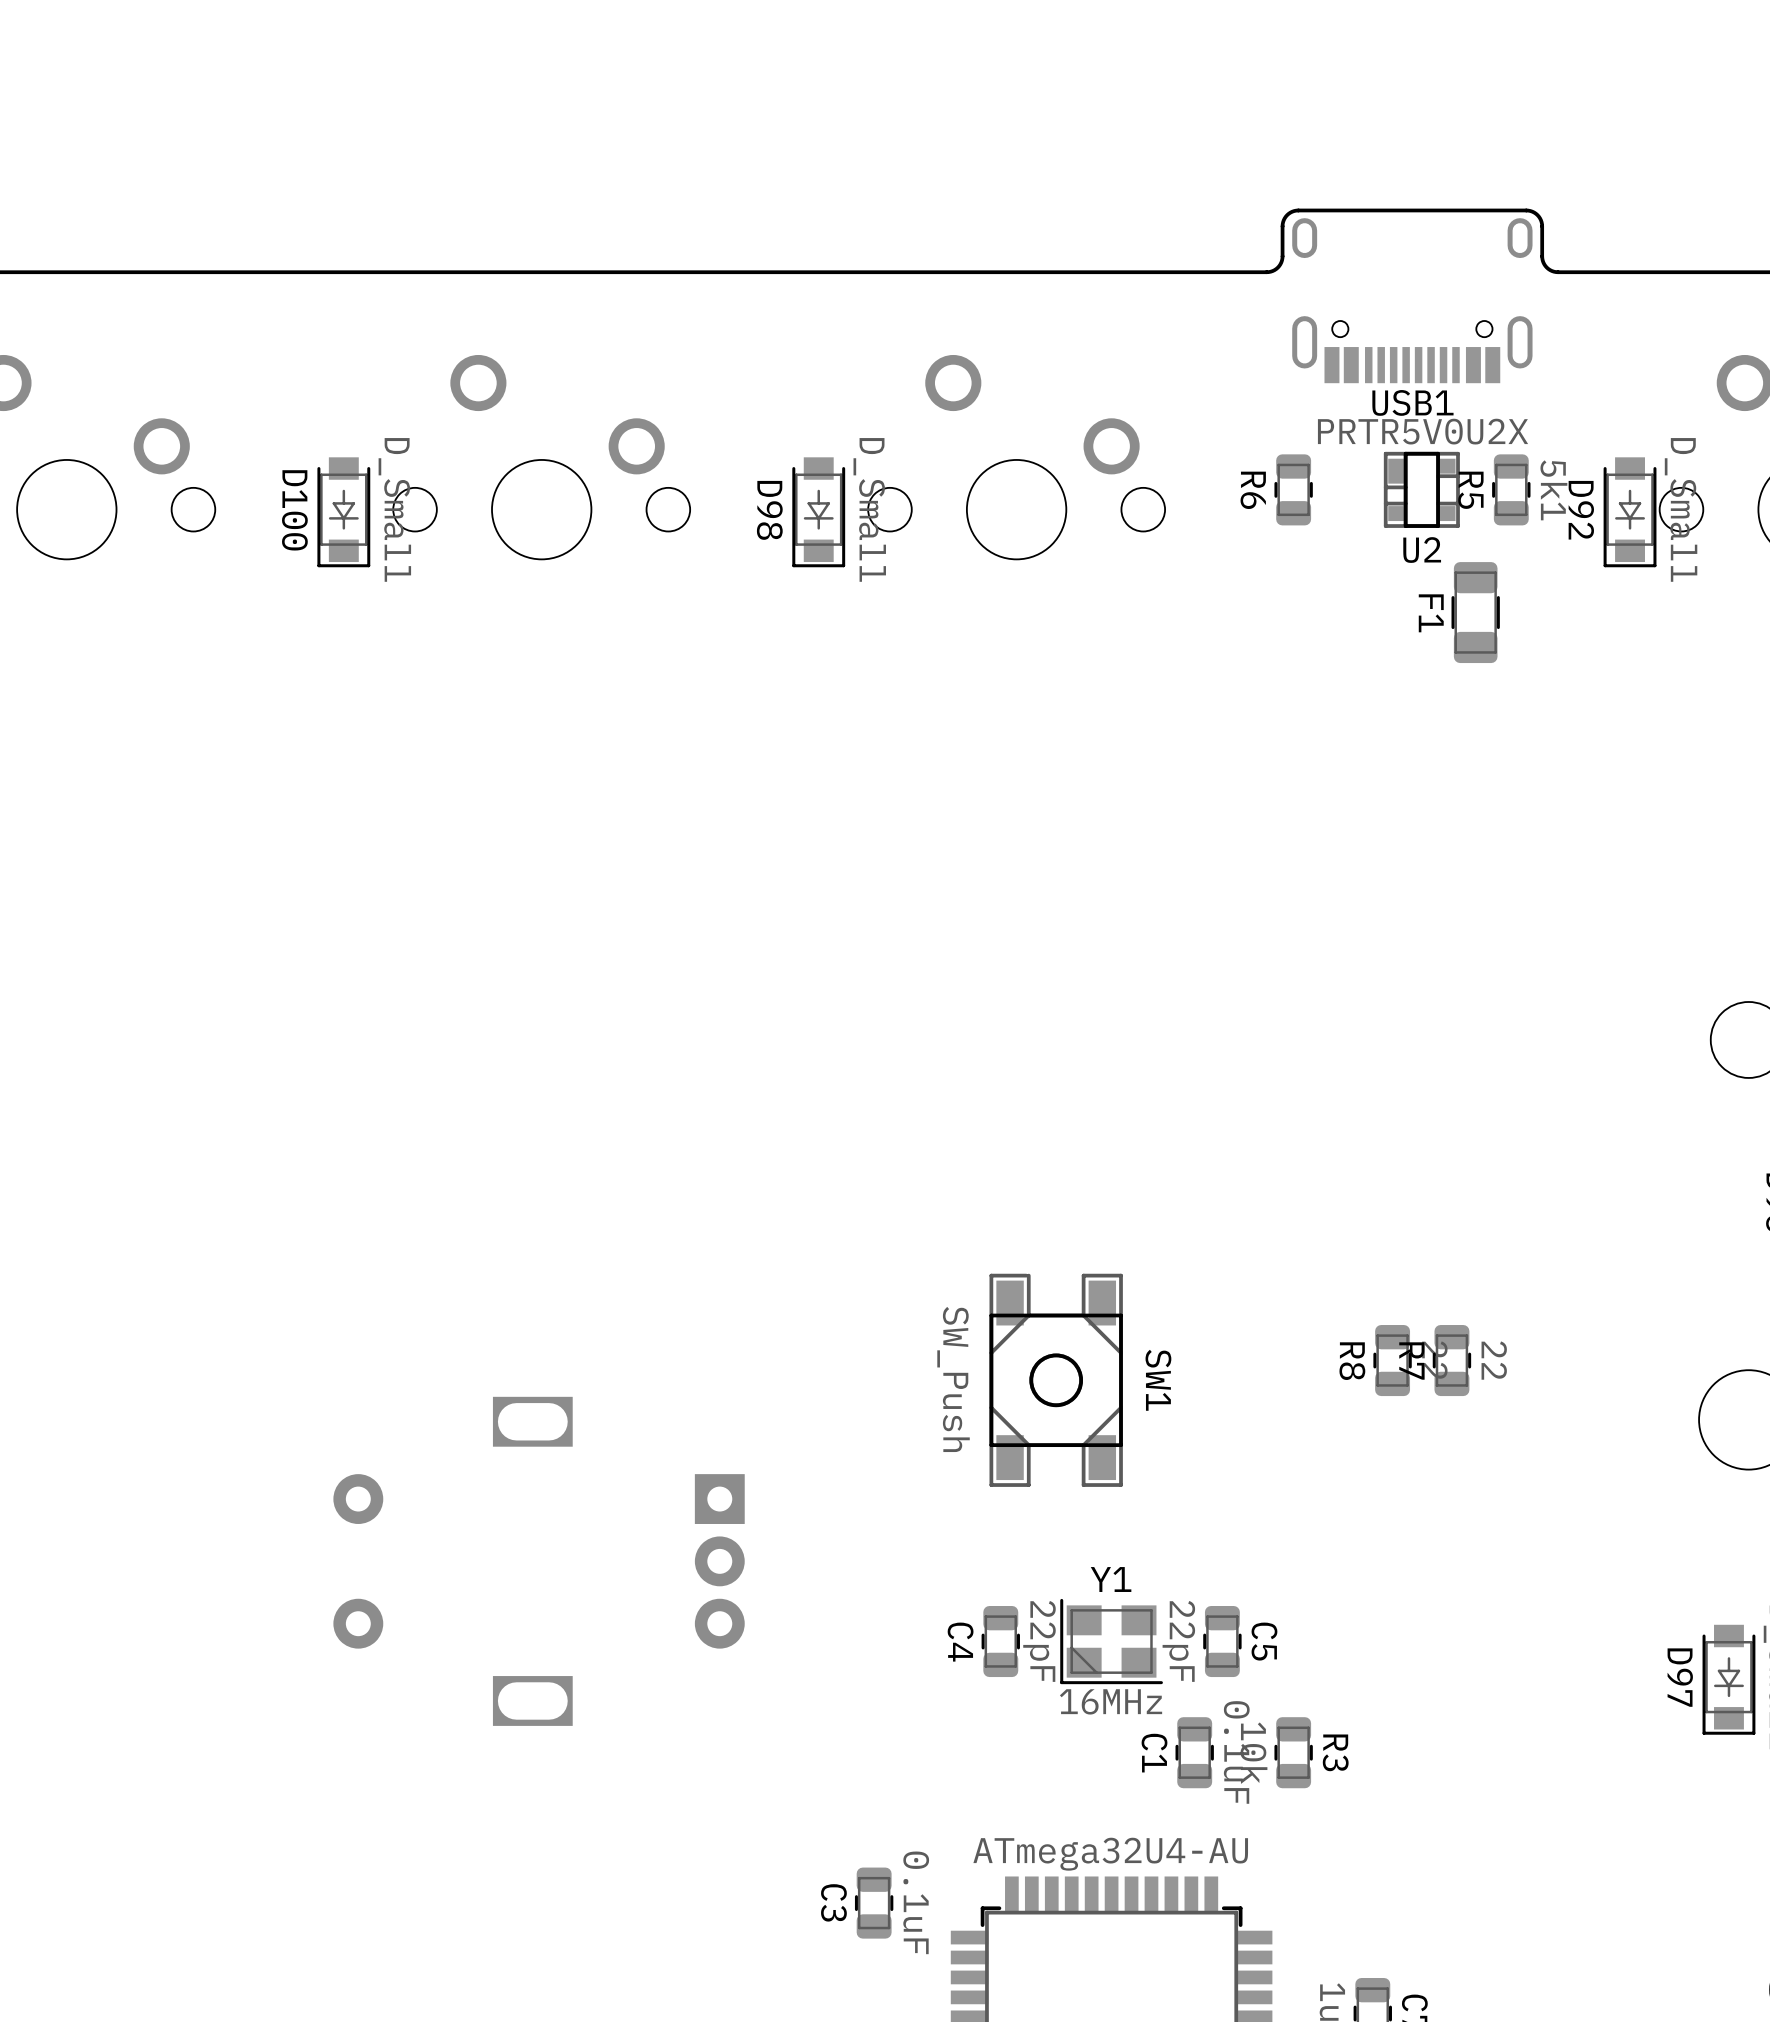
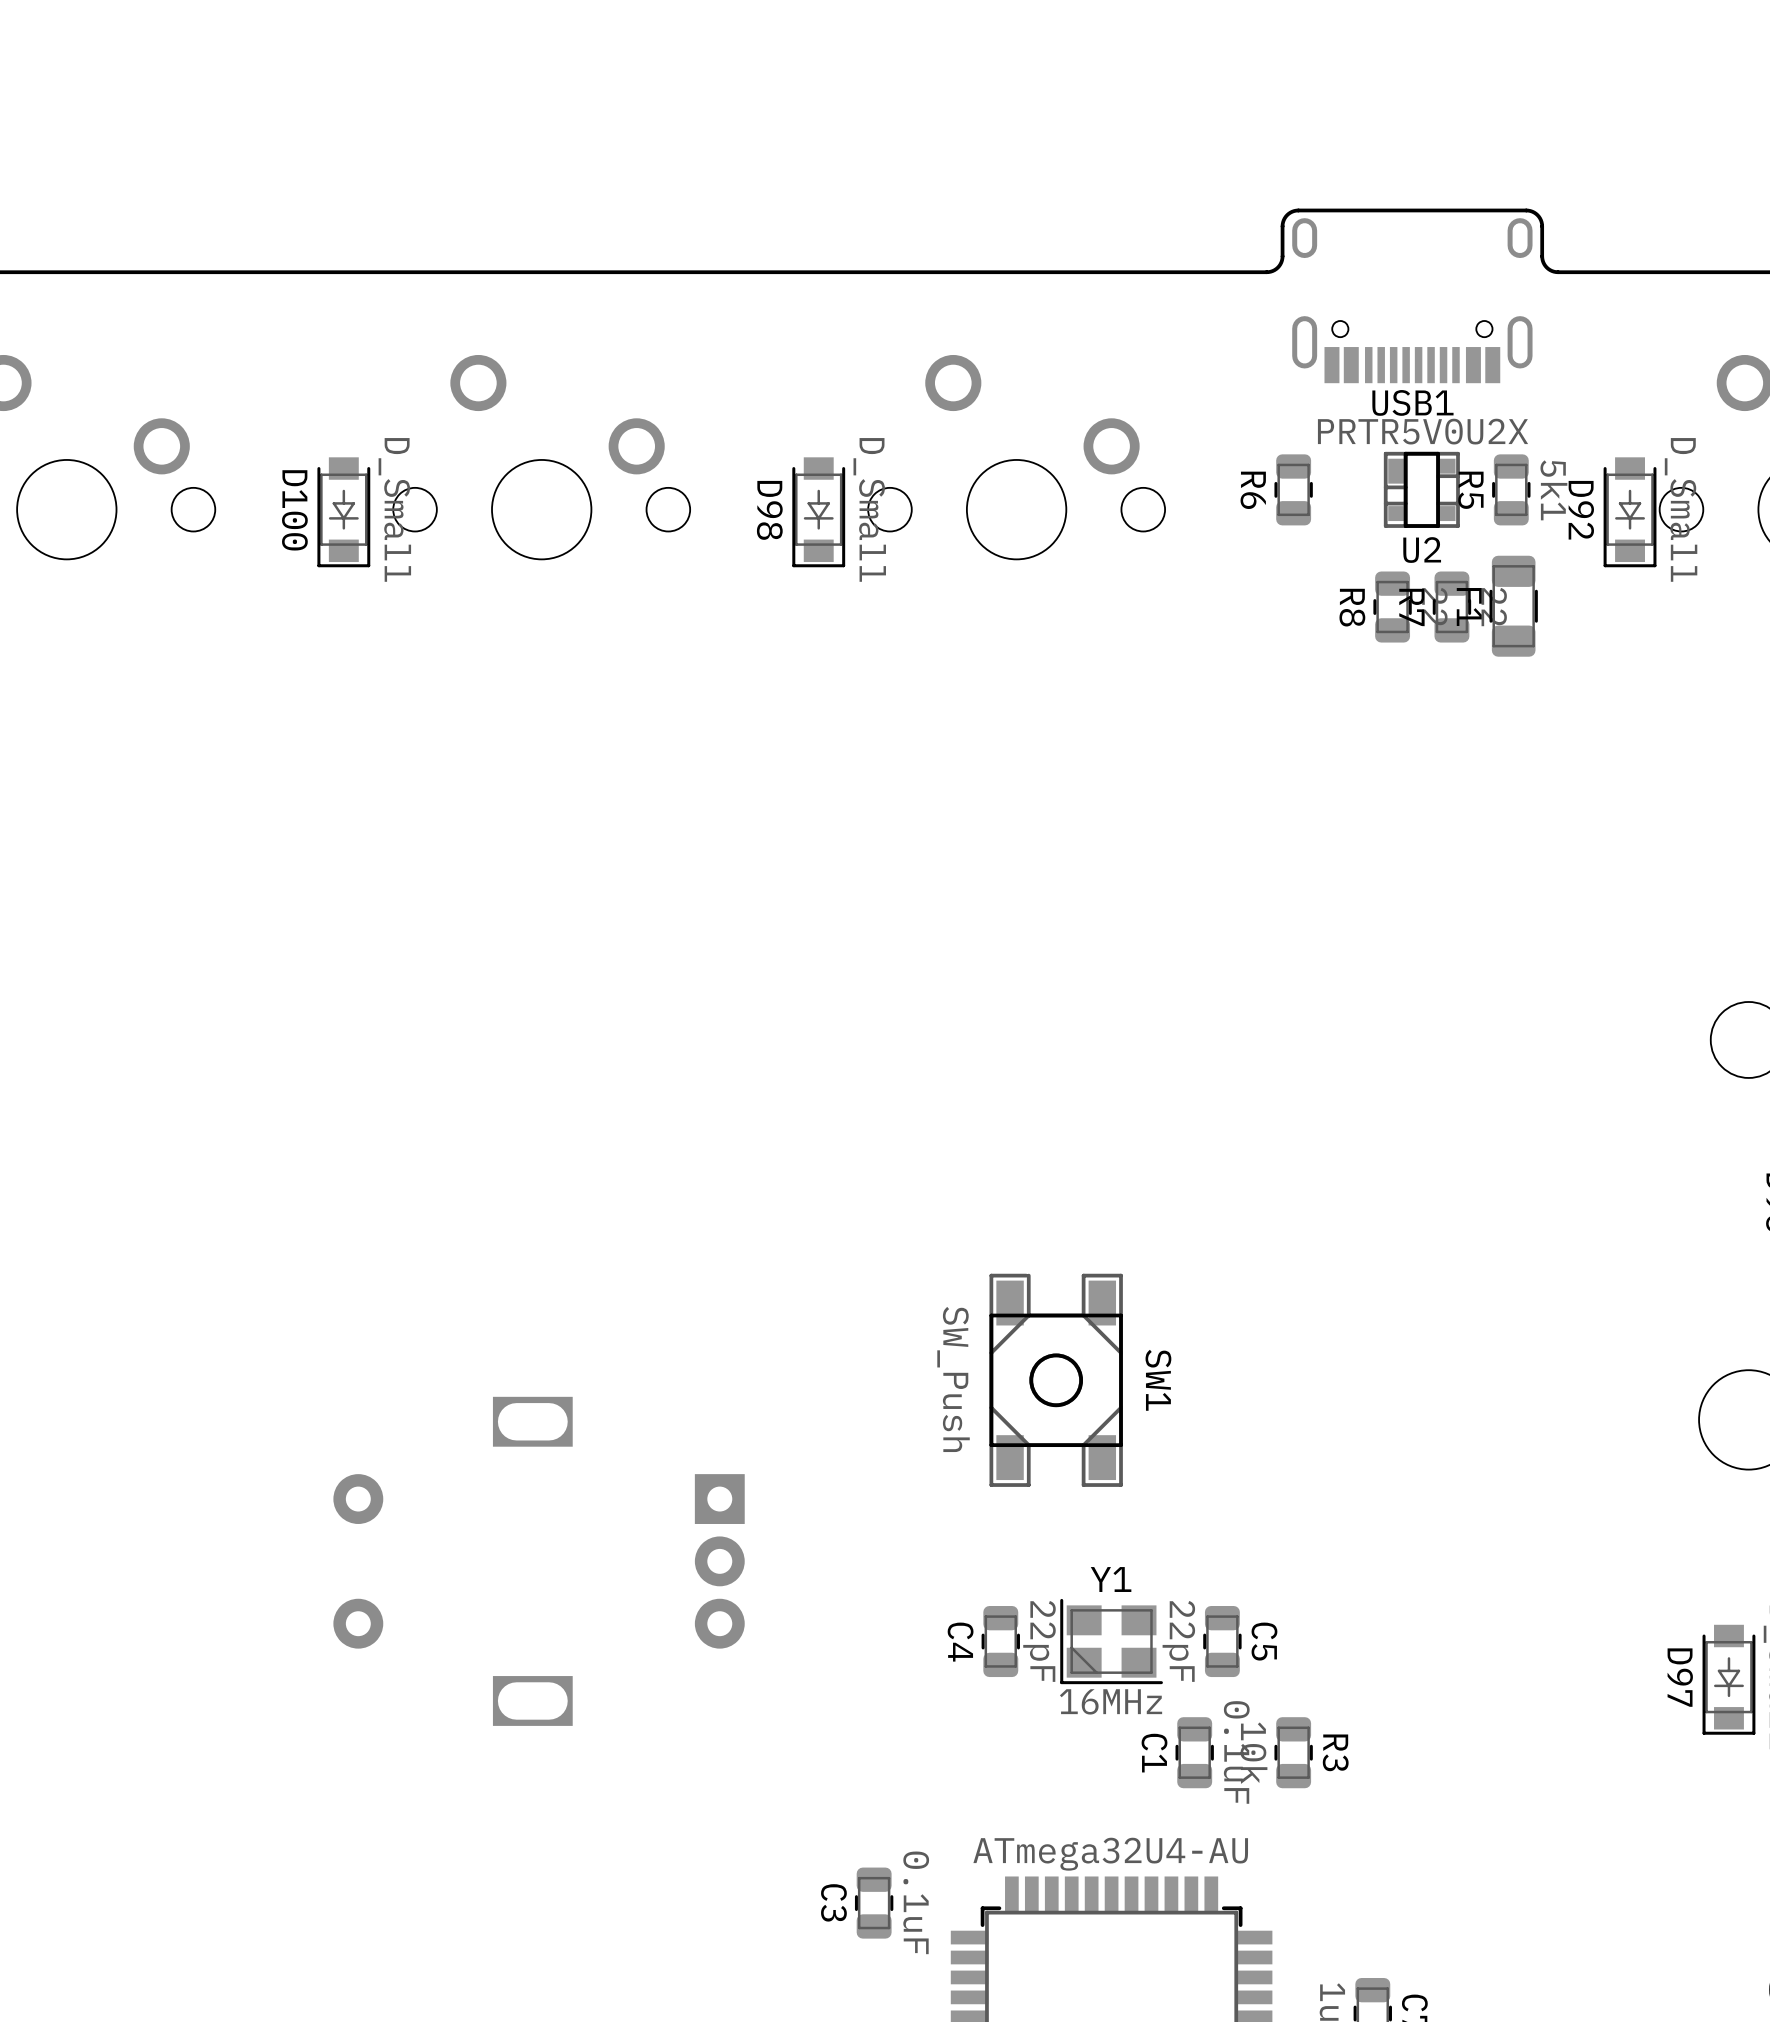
F1 position: (1475, 612) -> (1513, 606)
R8 position: (1392, 1360) -> (1392, 607)
R7 position: (1451, 1360) -> (1451, 607)

